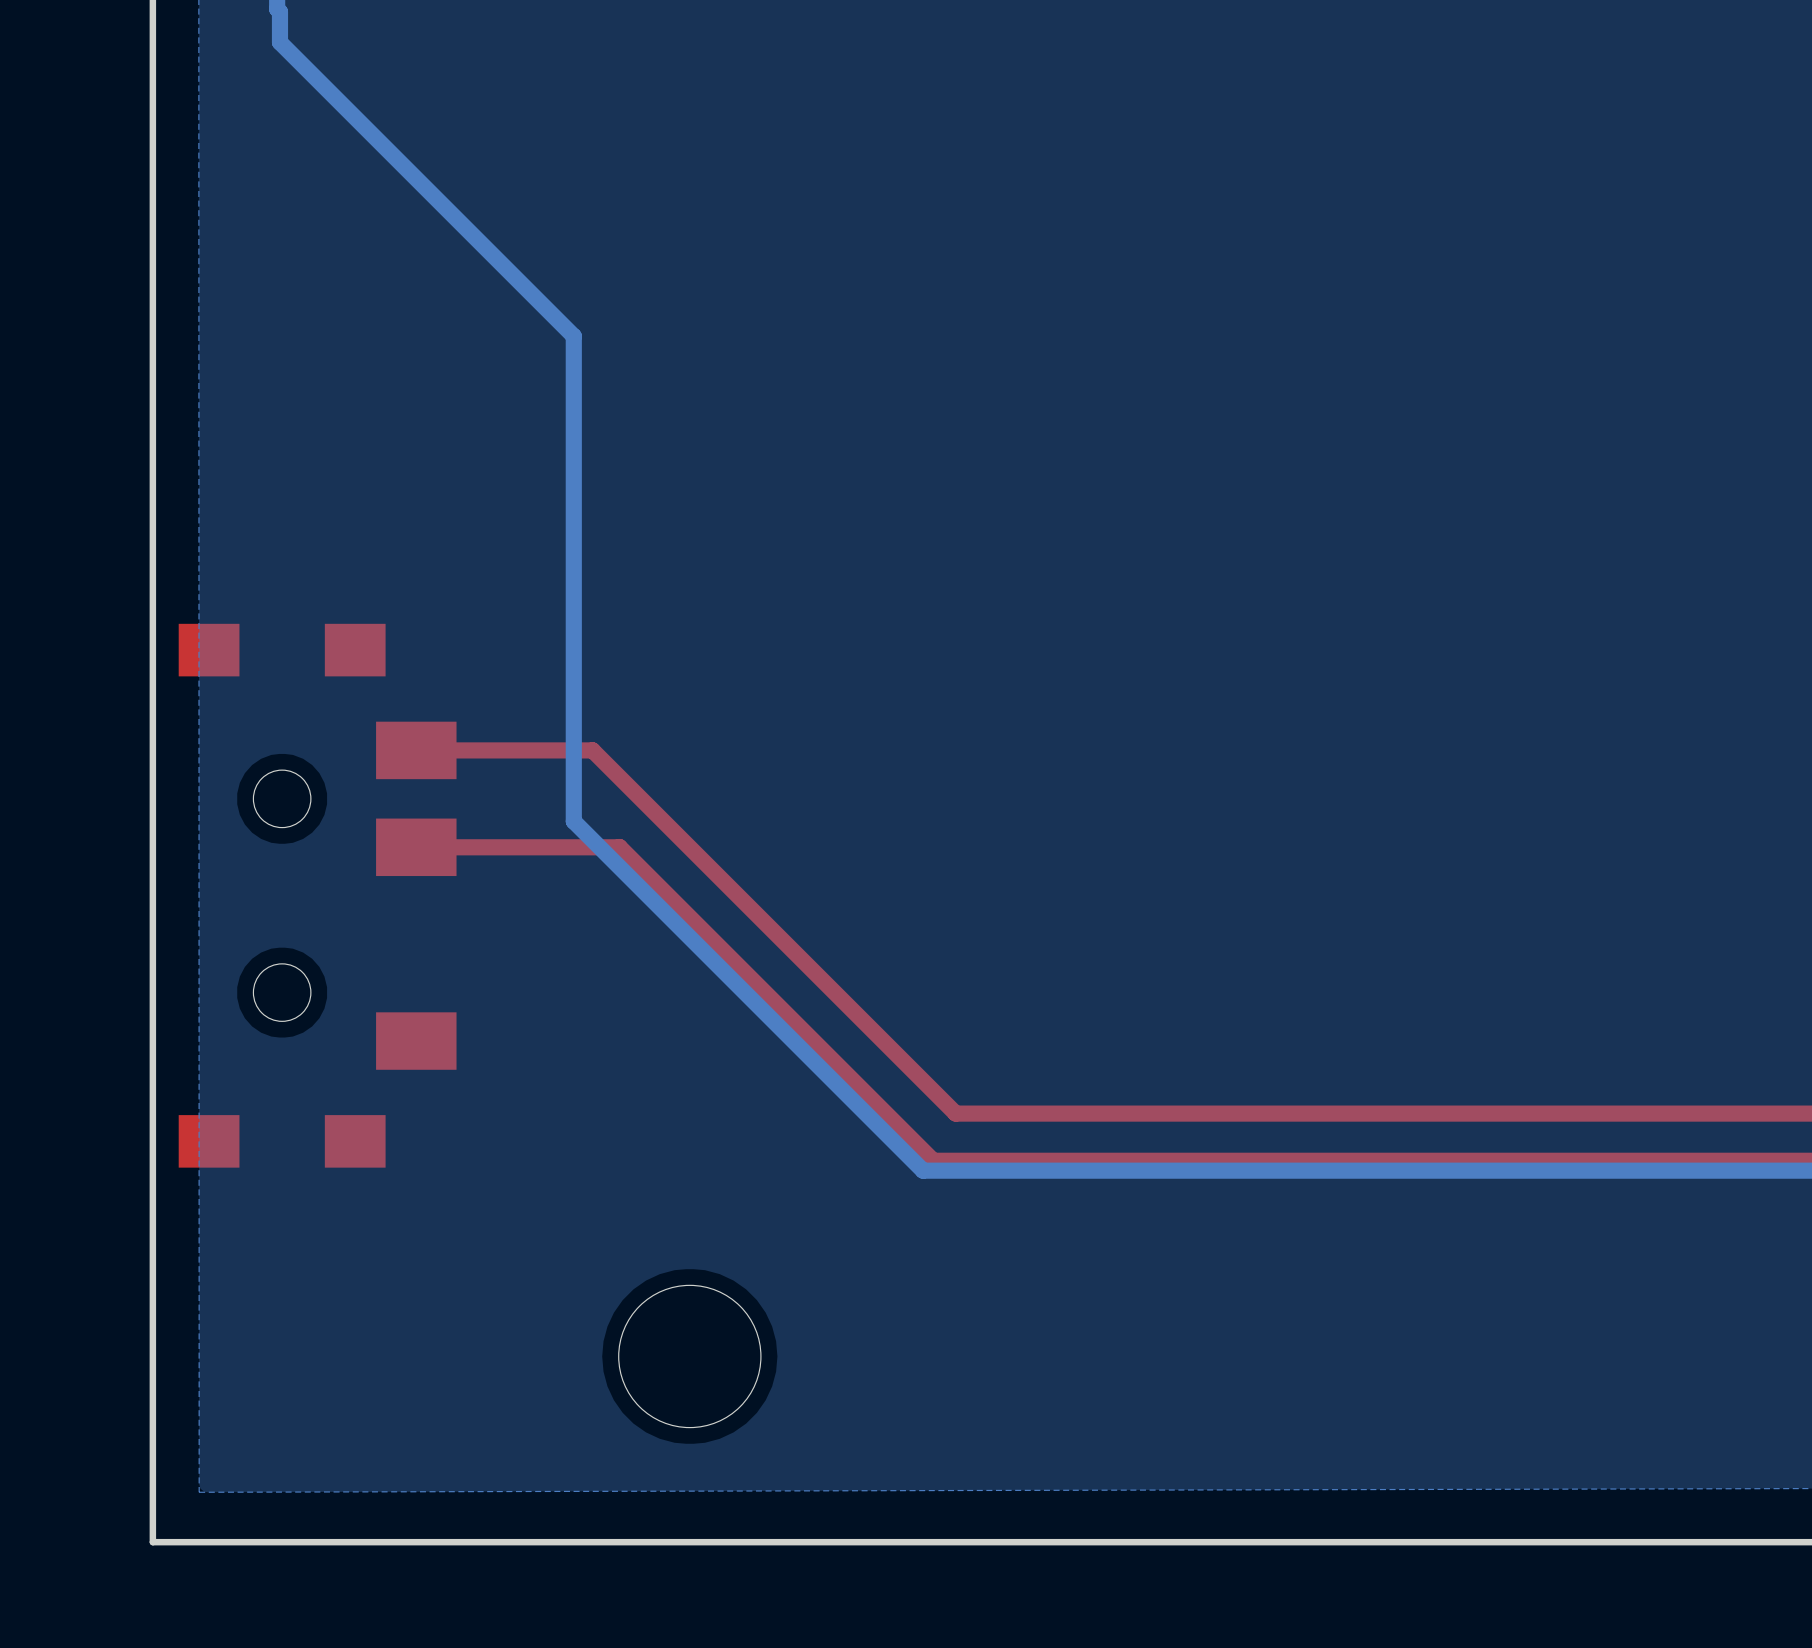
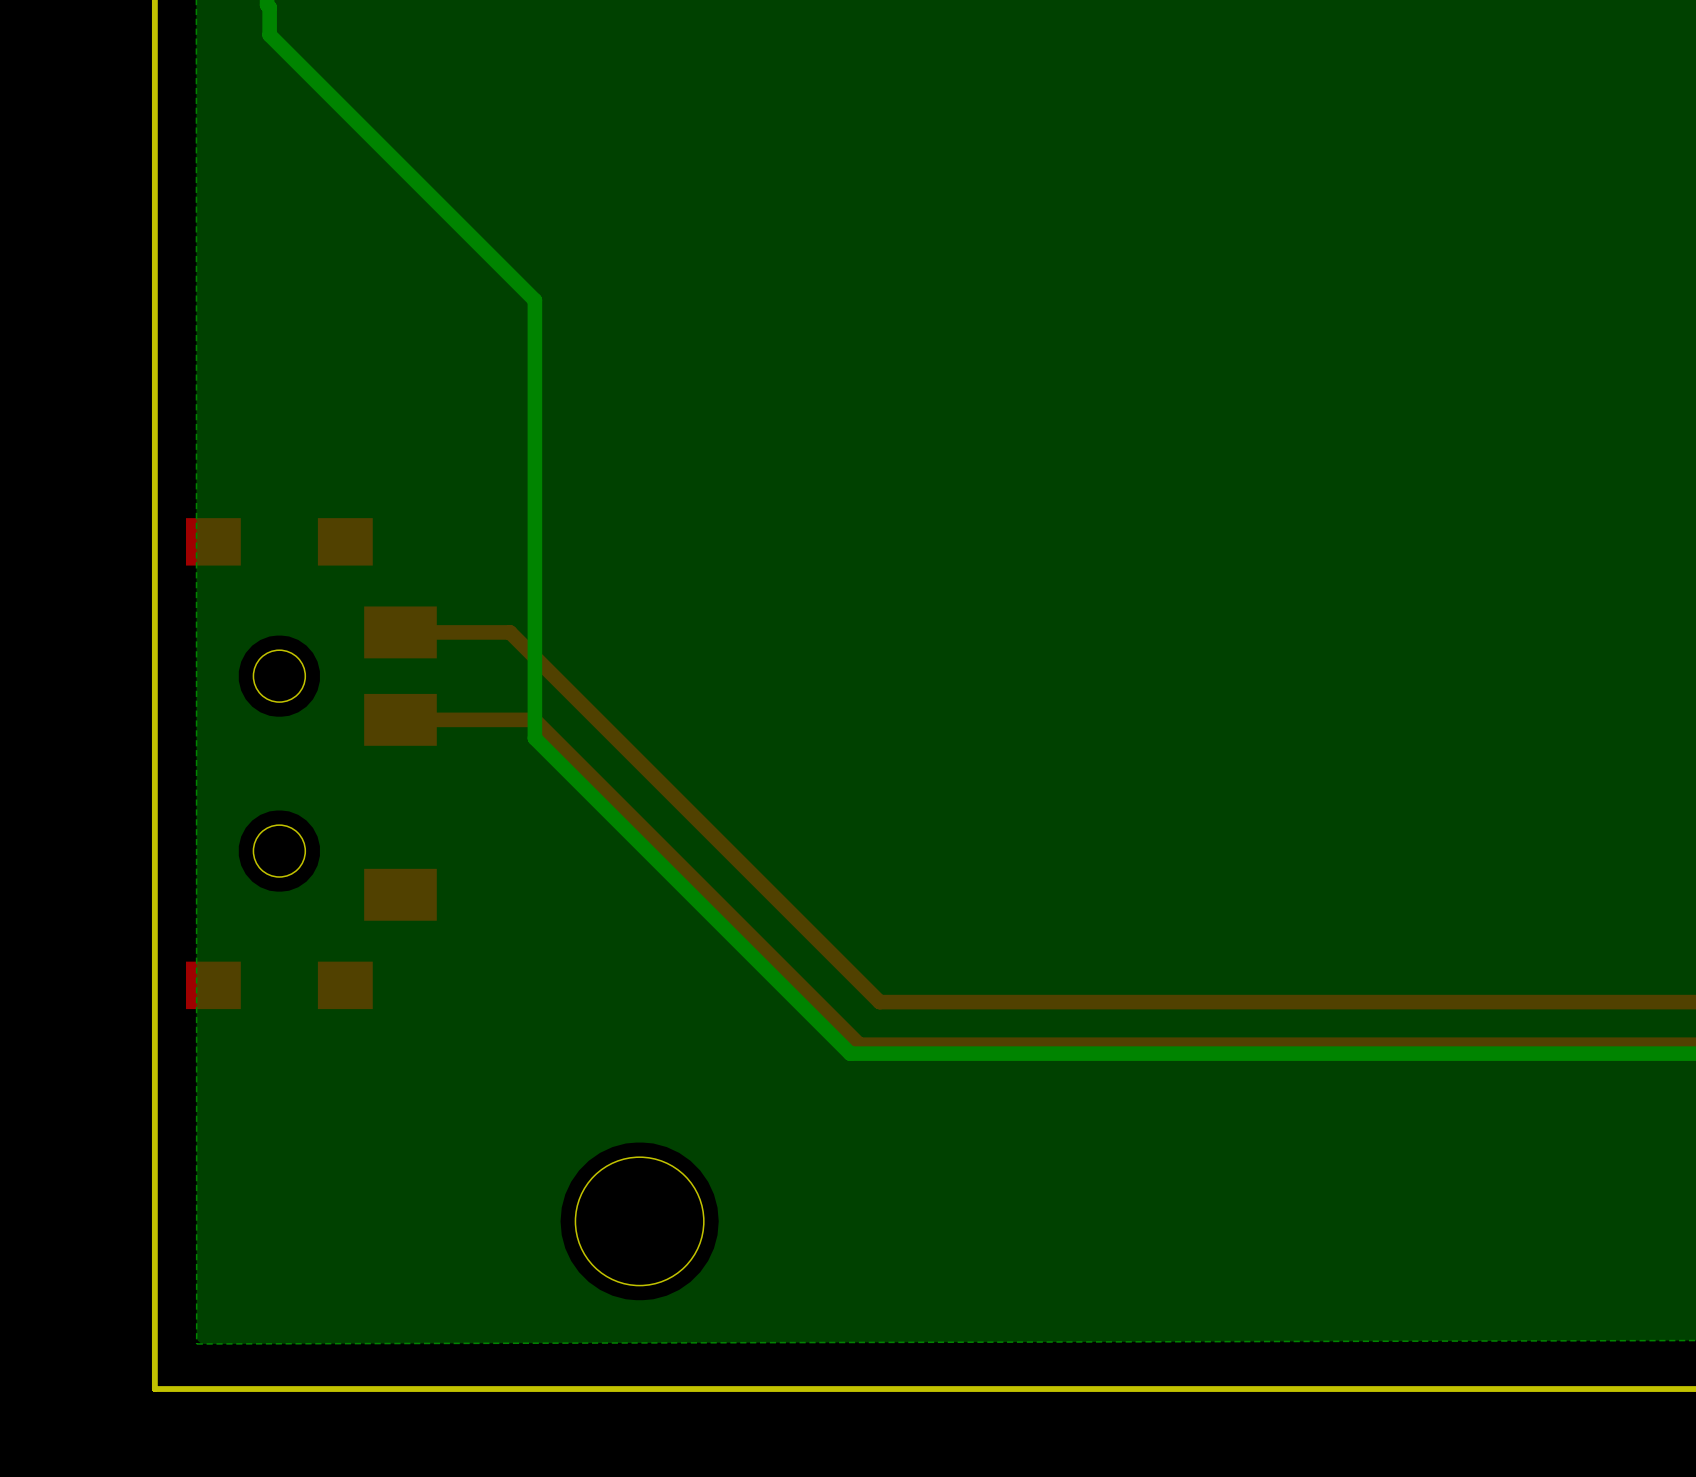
top track: (592, 750) (416, 750) -> (551, 674) (510, 632) (400, 632)
top track: (619, 847) (416, 847) -> (576, 761) (534, 719) (400, 719)
part position: (317, 895) -> (311, 763)

